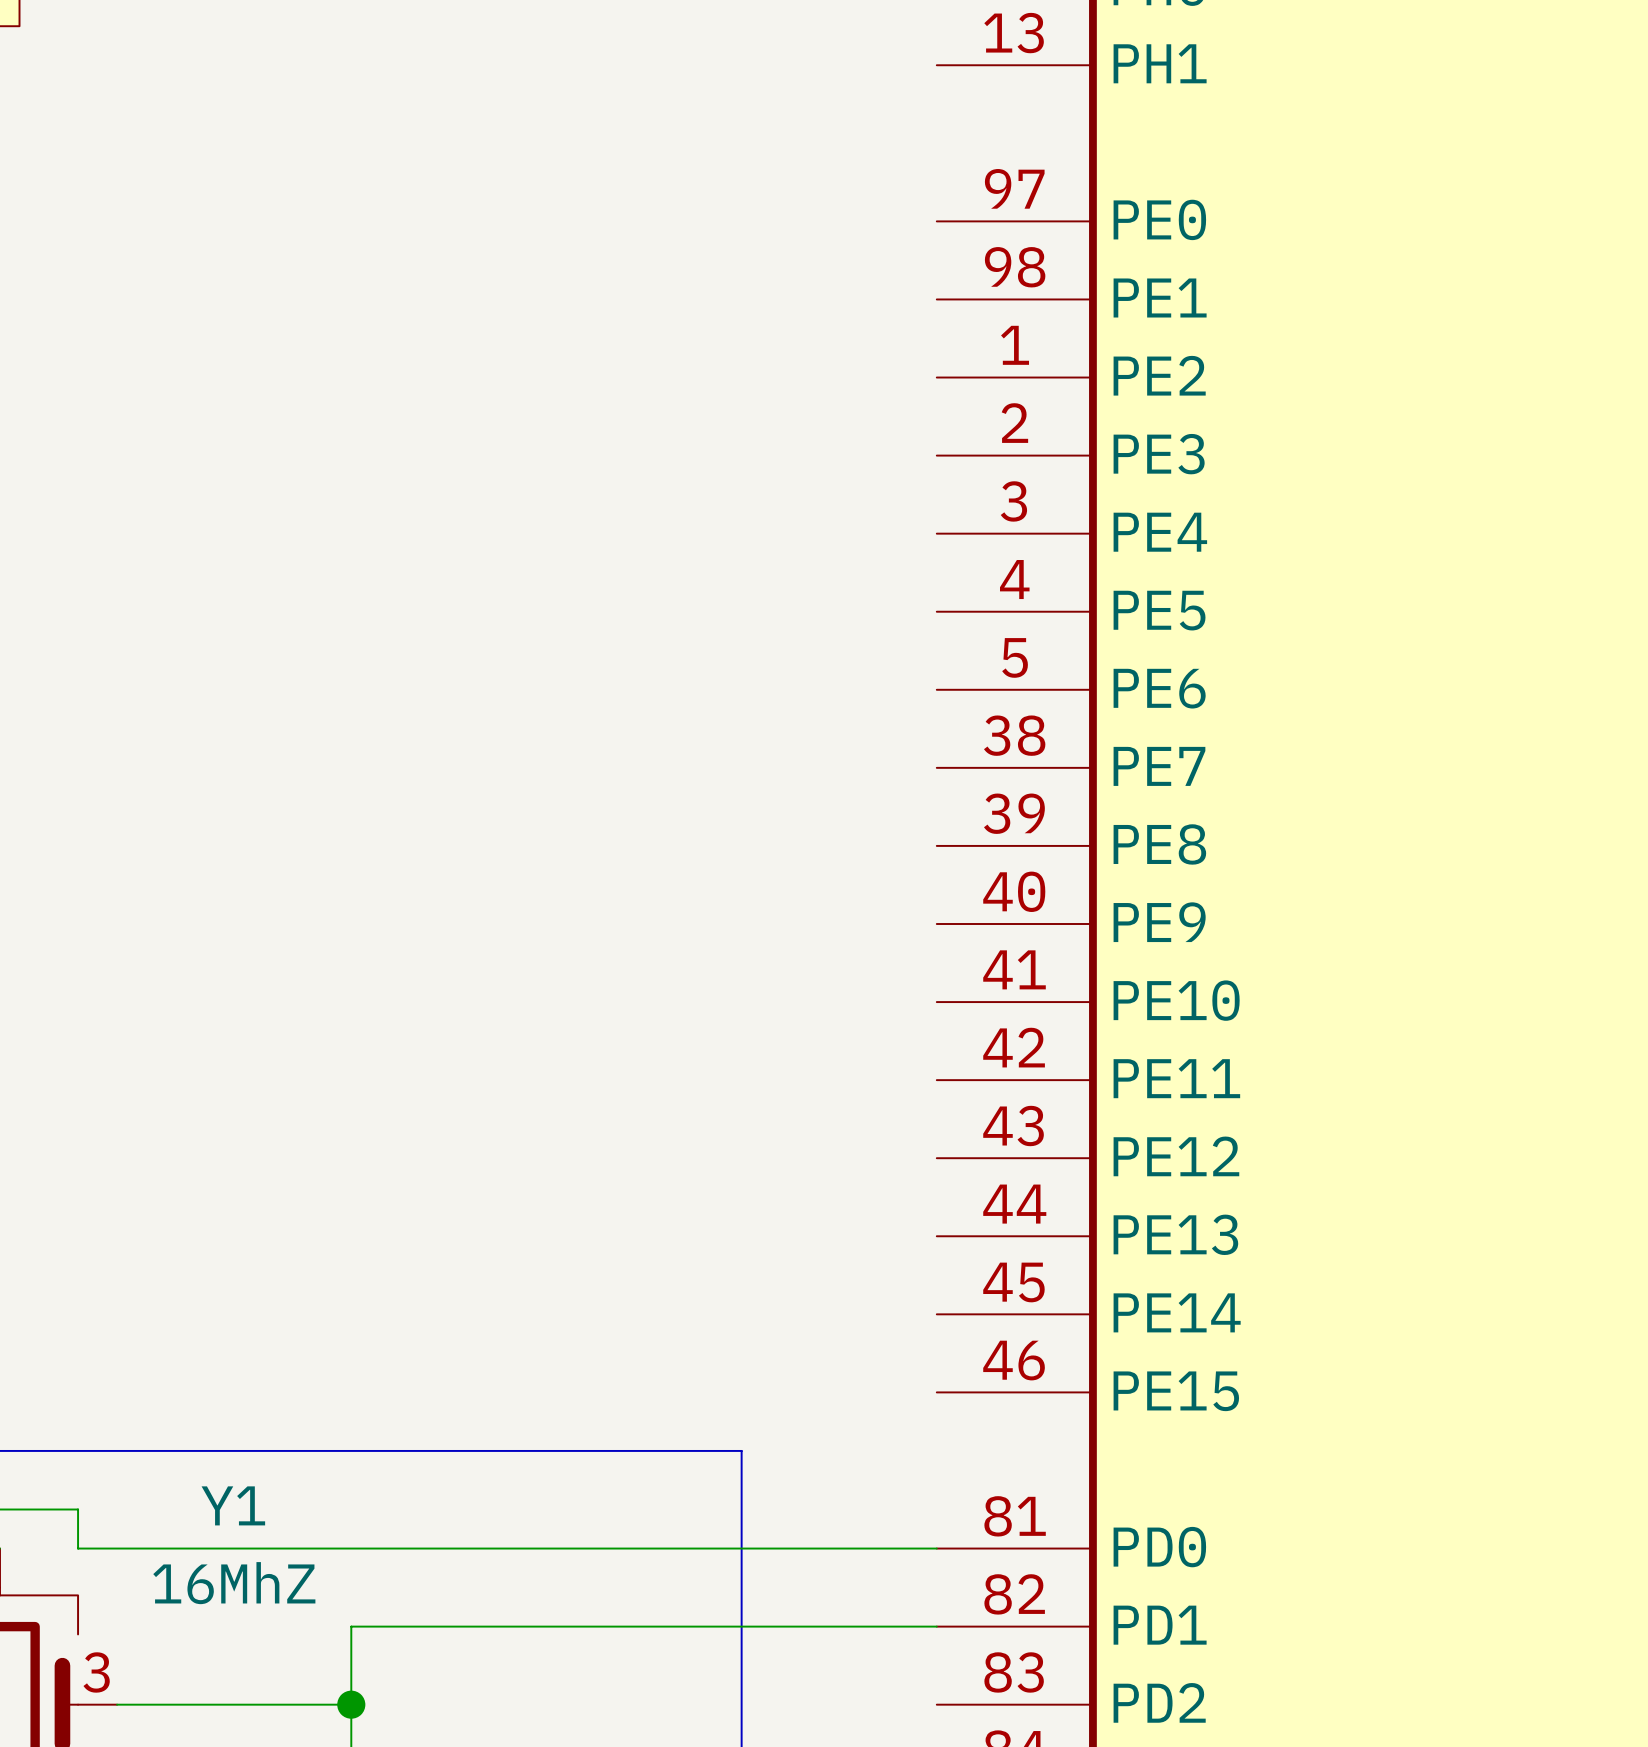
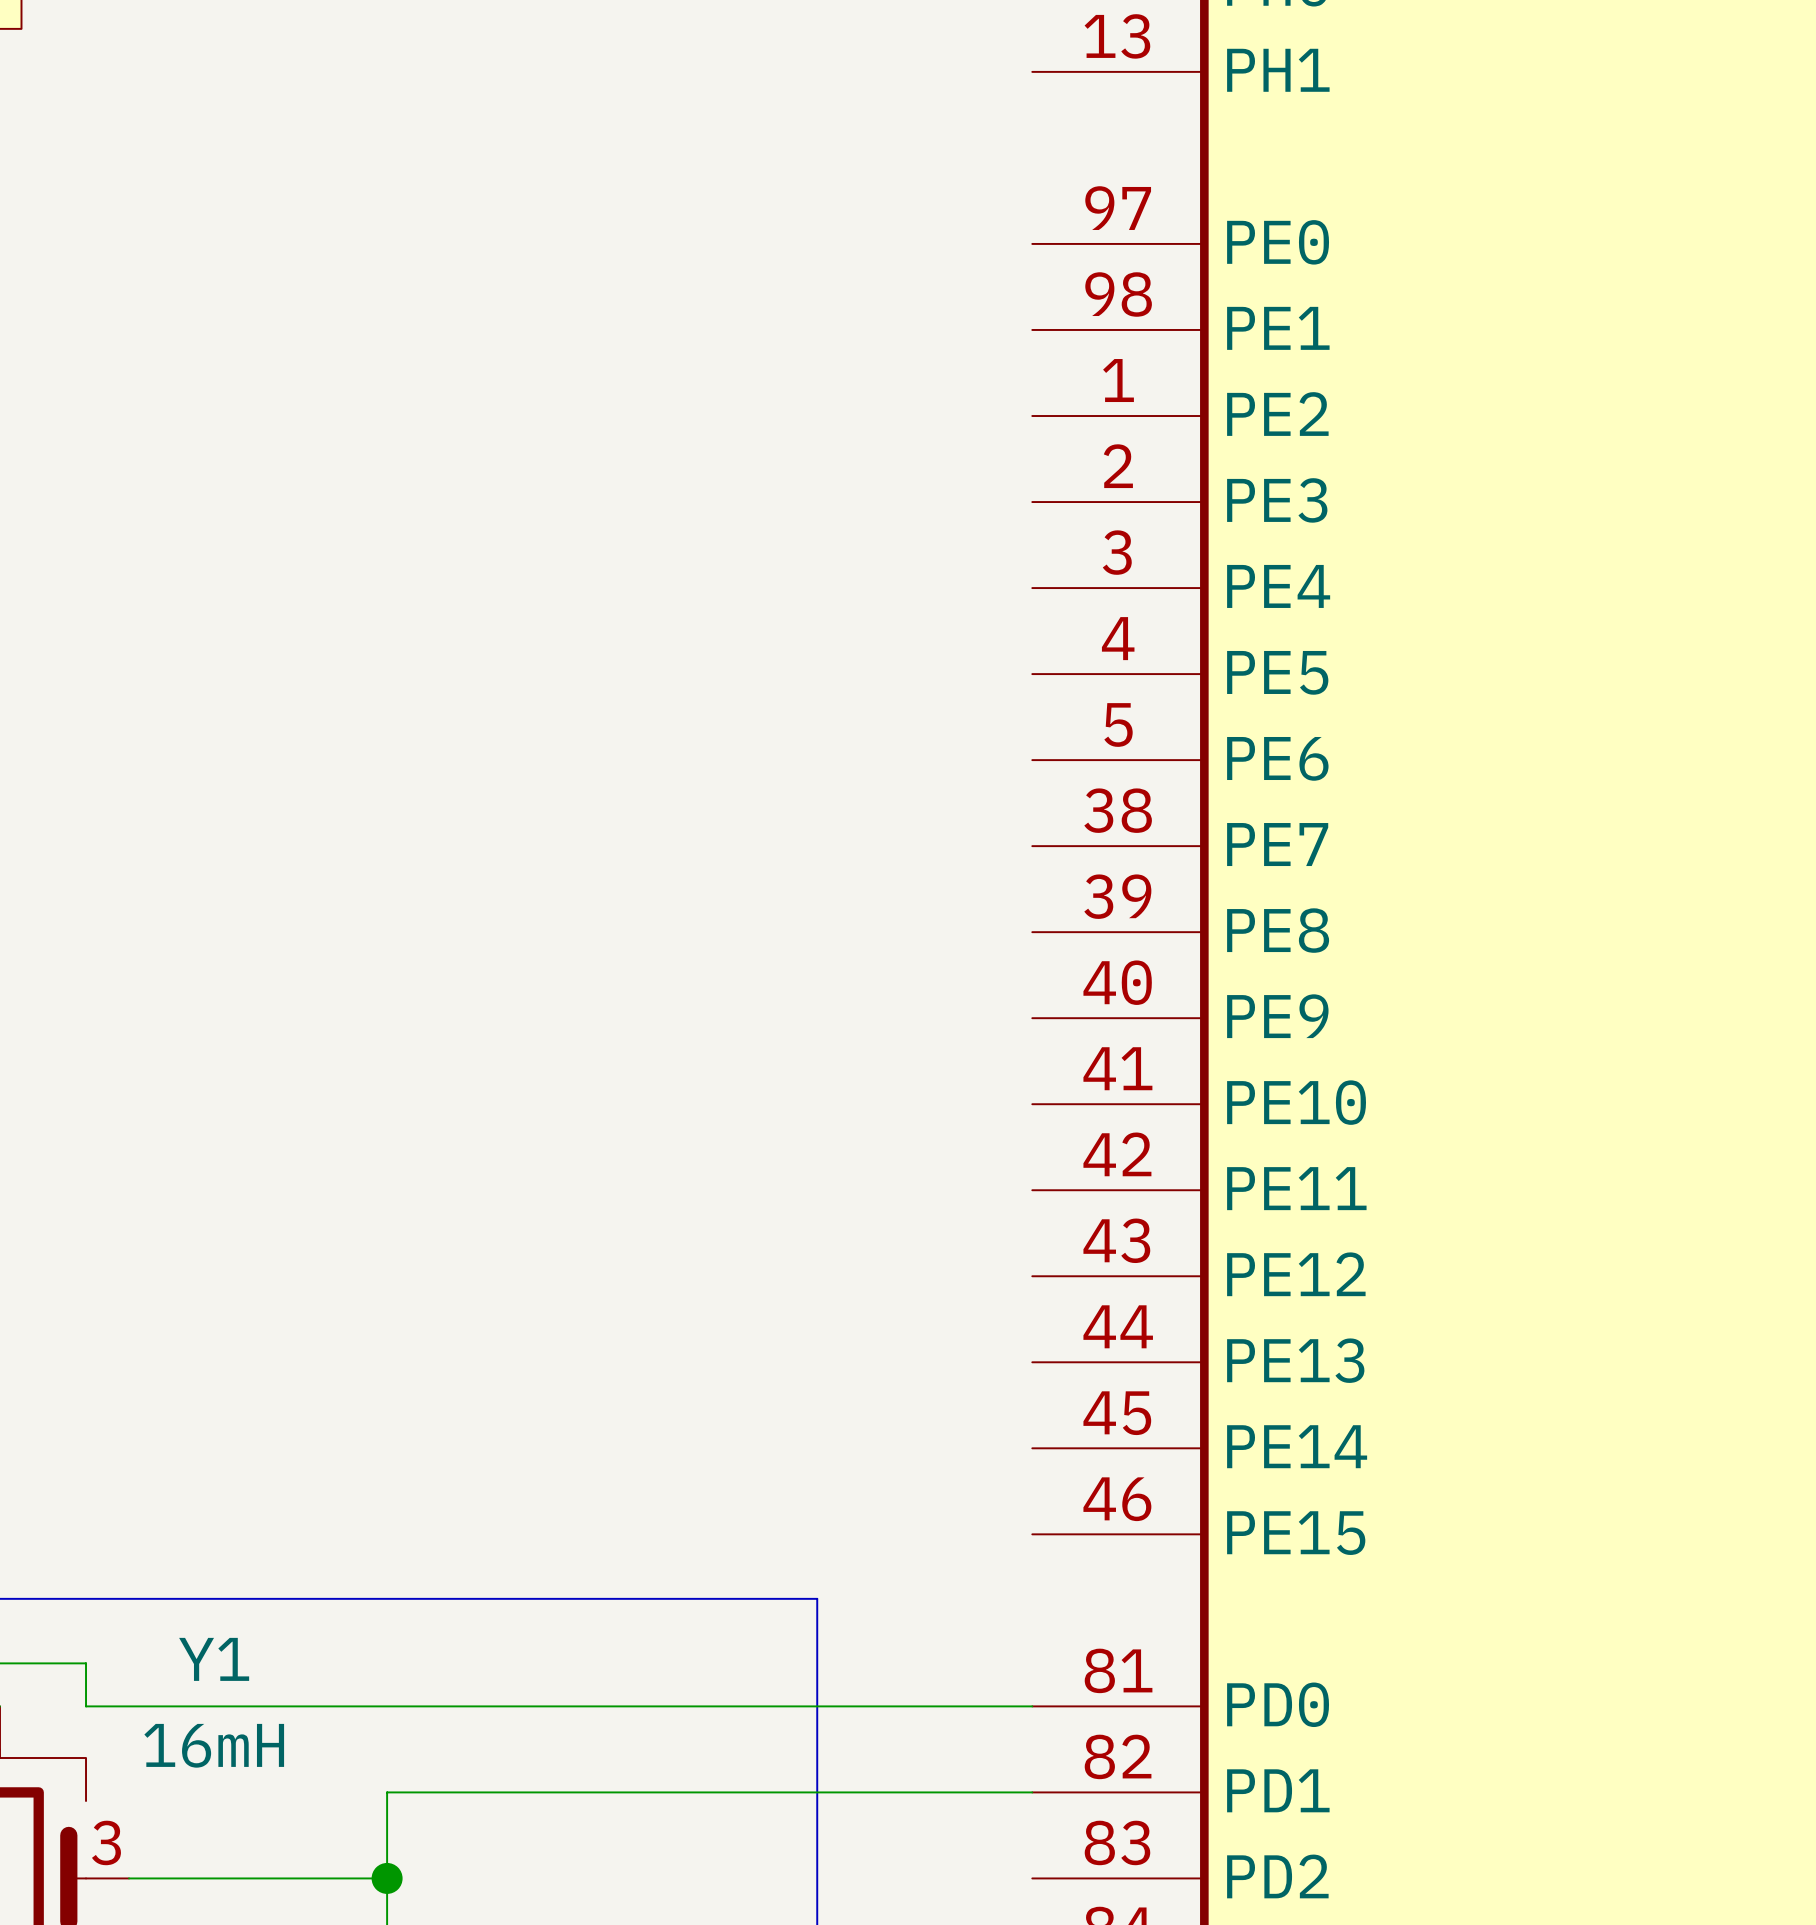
Y1 name position: Y1 (233, 1505) -> Y1 (214, 1659)
Y1 value: 16MhZ (234, 1583) -> 16mH (214, 1745)

